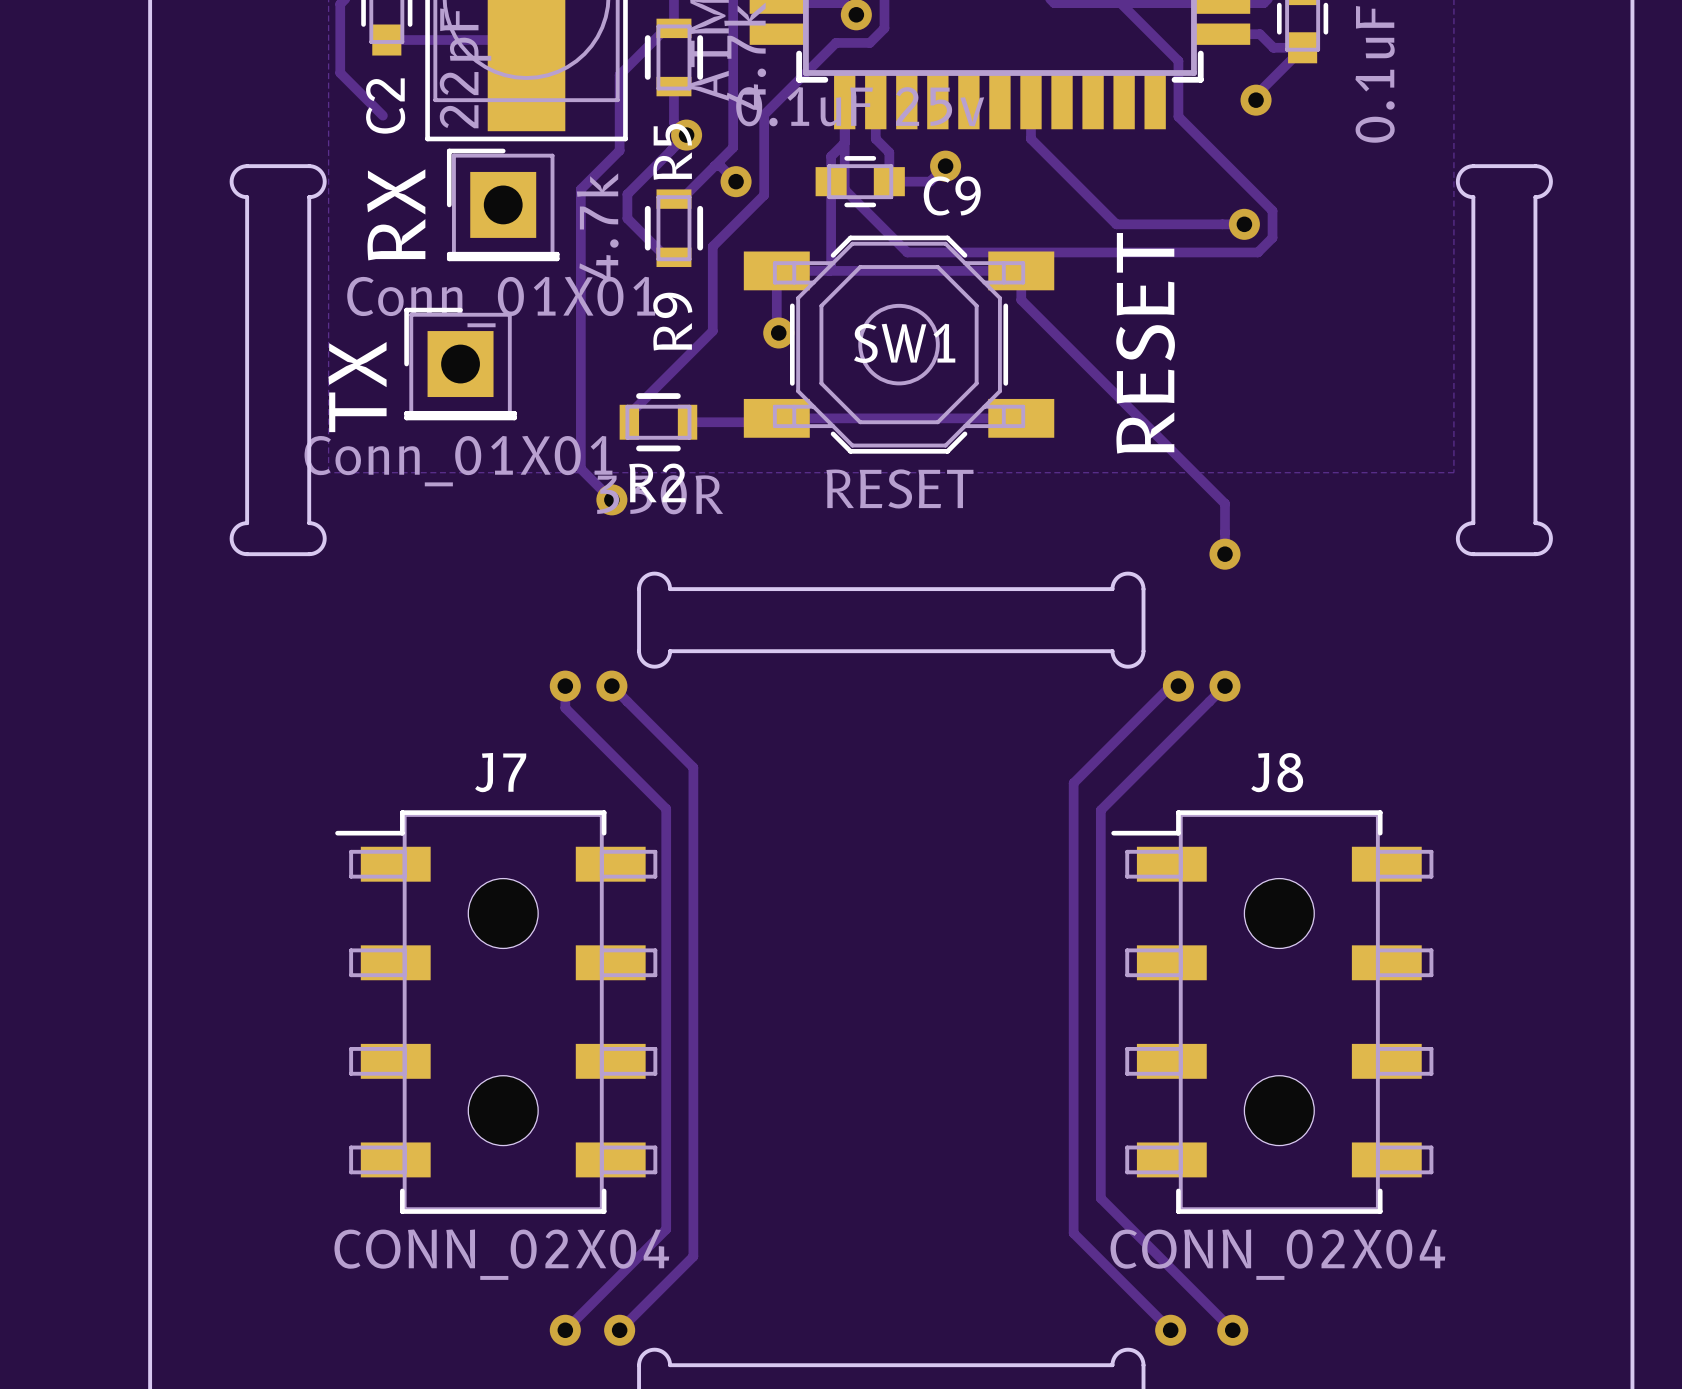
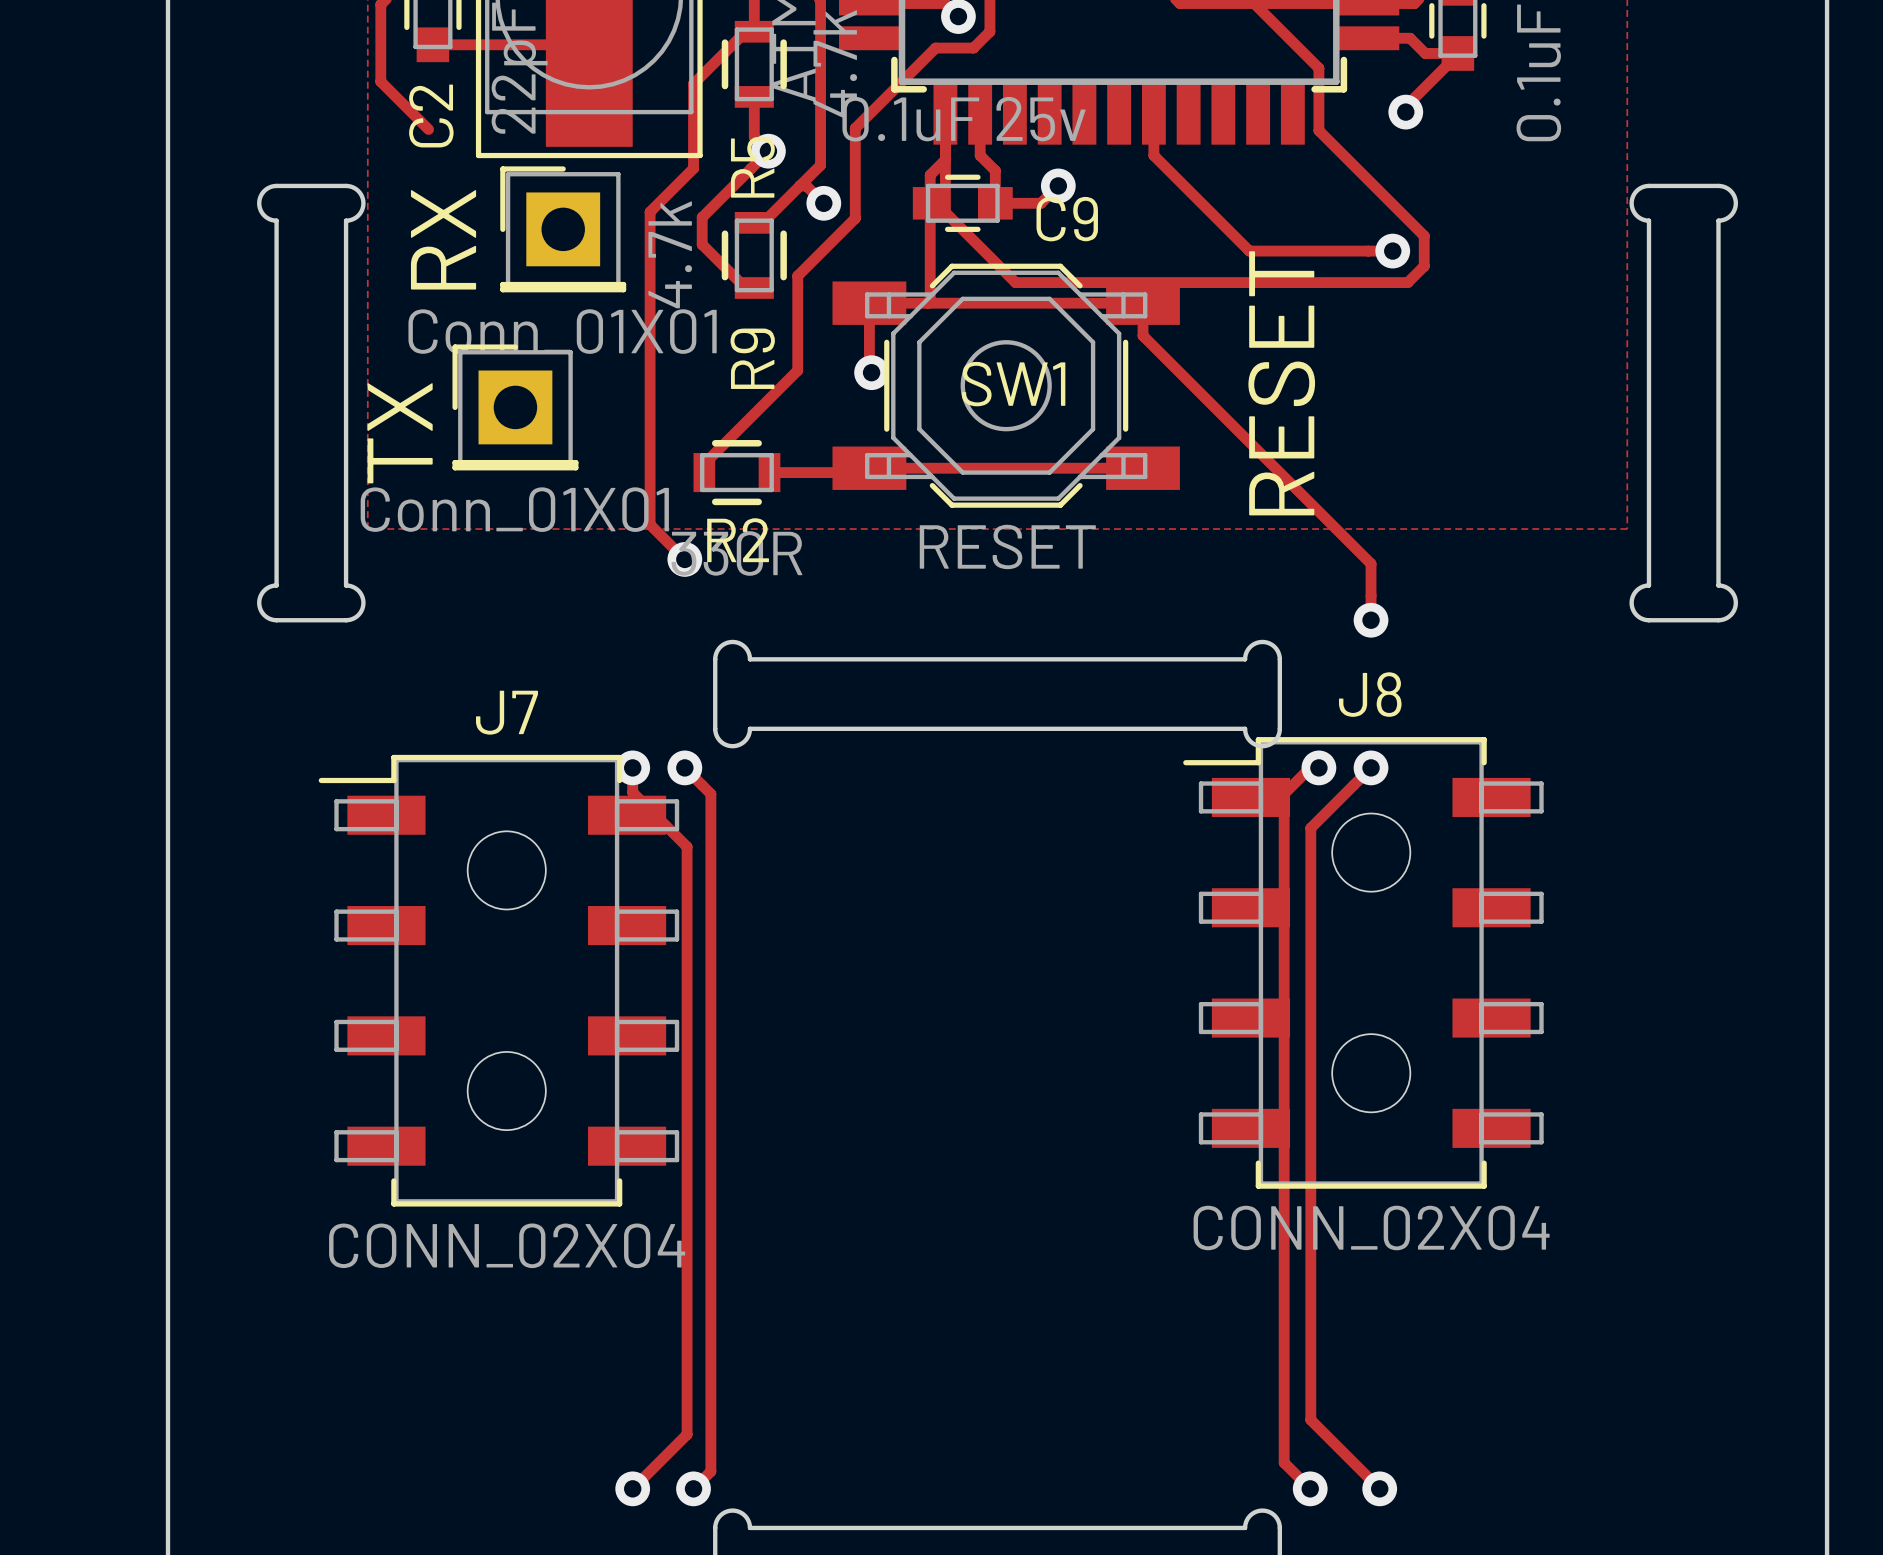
track: (635, 709) (693, 767) (693, 1256) (635, 1314) -> (710, 793) (710, 1471)
track: (1147, 709) (1073, 783) (1073, 1233) (1147, 1306) -> (1284, 793) (1284, 1462)
track: (1171, 739) (1100, 810) (1100, 1198) (1171, 1268) -> (1310, 828) (1310, 1419)
track: (613, 756) (666, 808) (666, 1229) (613, 1281) -> (687, 846) (687, 1434)
J7 position: (496, 1012) -> (498, 980)
J8 position: (1272, 1012) -> (1363, 962)

